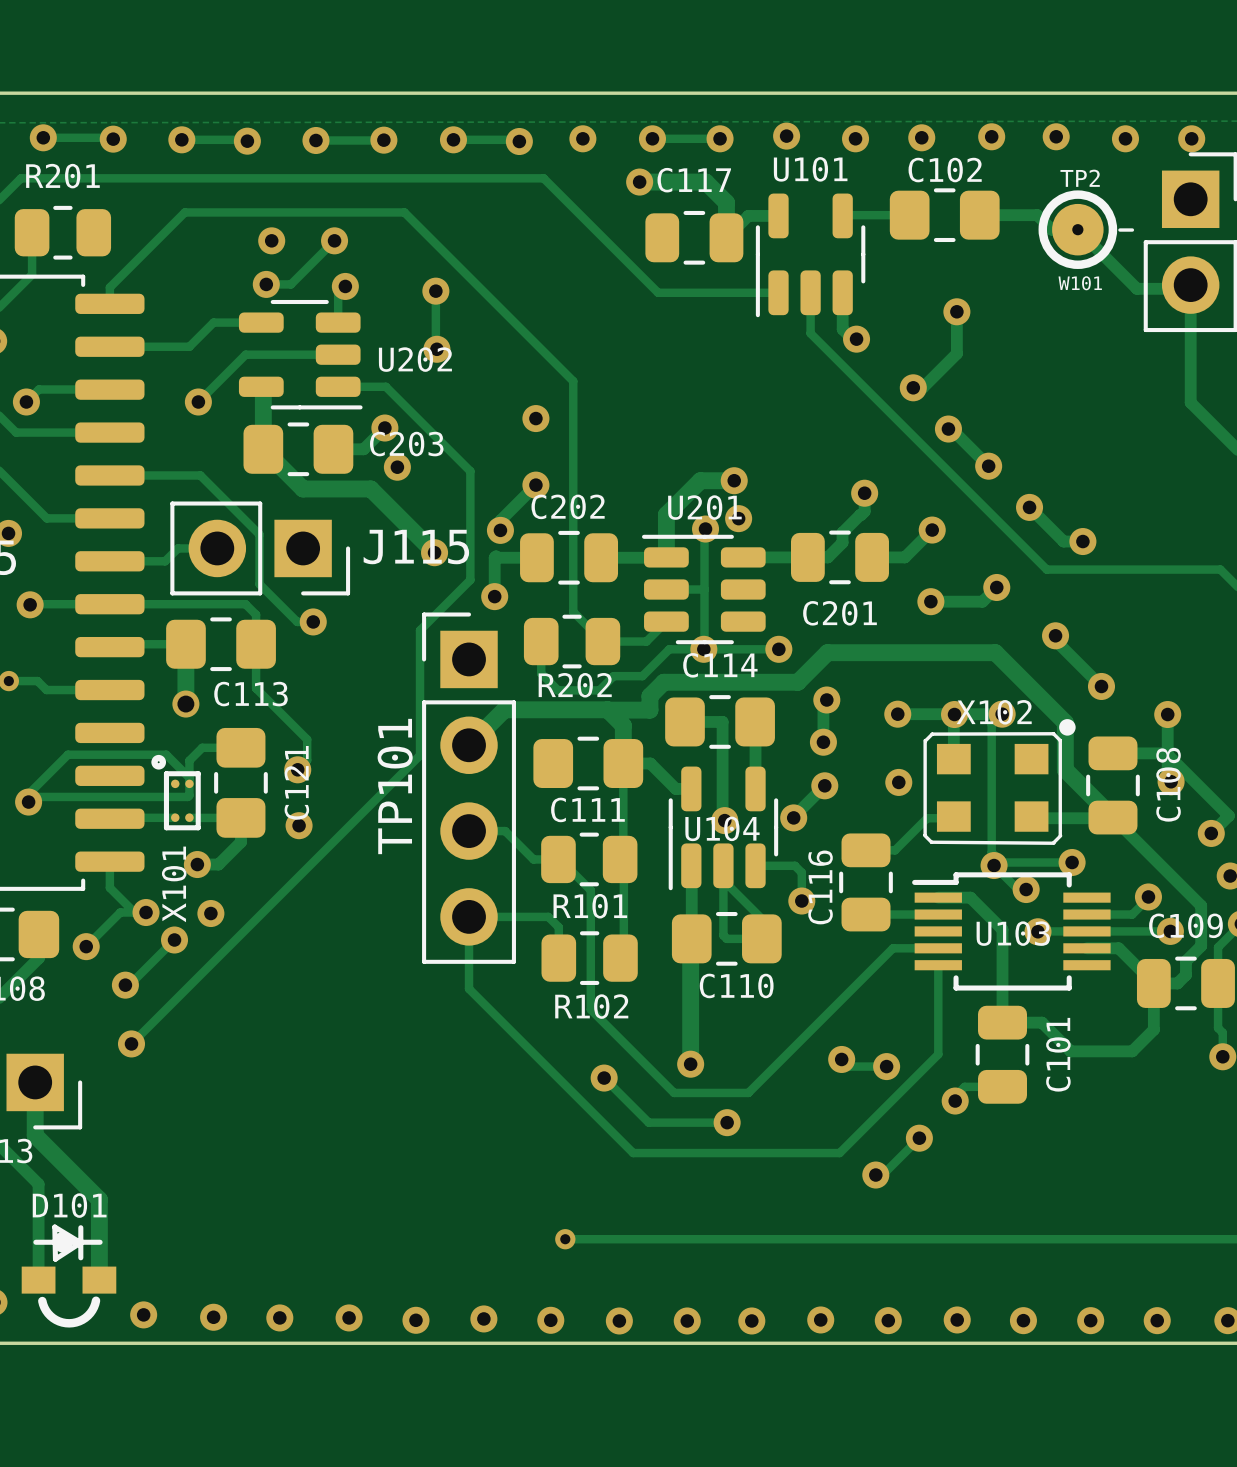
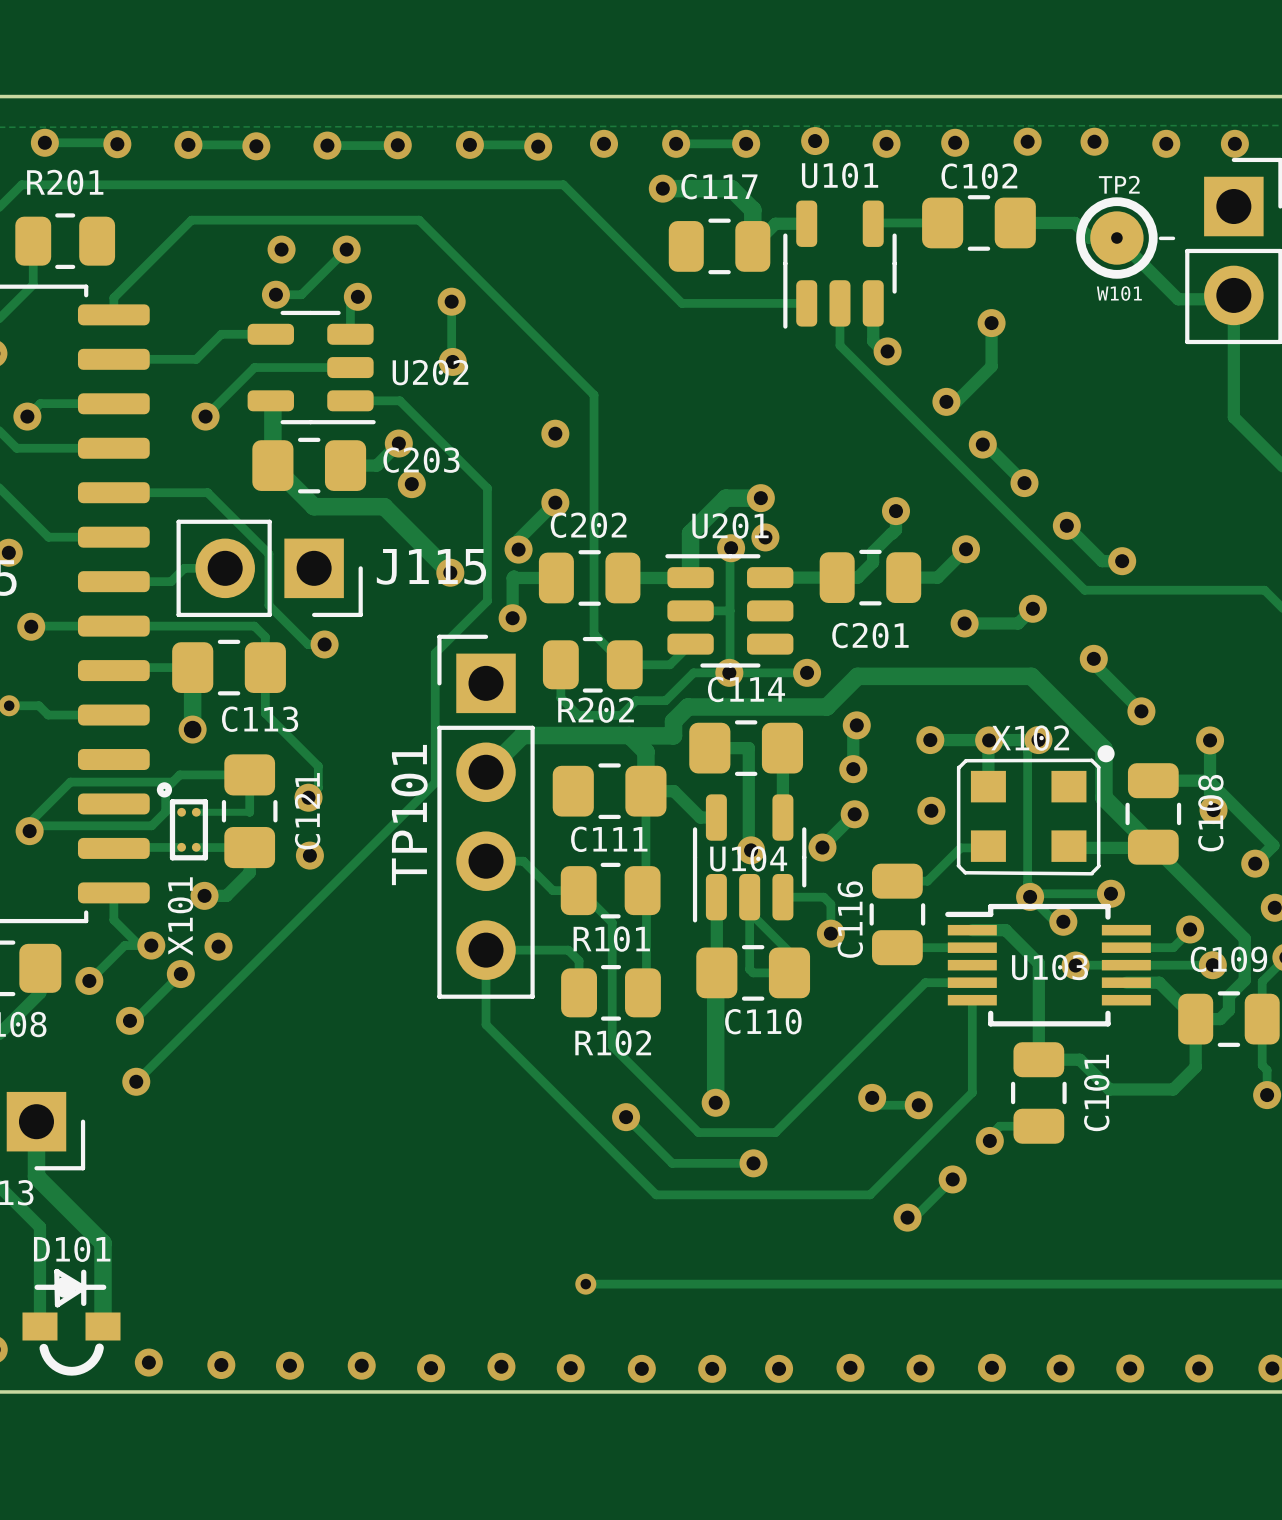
track: (202, 747) (189, 760) (187, 796) (146, 796) -> (209, 774) (179, 774) (165, 789) (165, 811) (151, 825)
track: none -> (249, 774) (249, 812) (196, 812)
track: (166, 754) (189, 777) -> none

